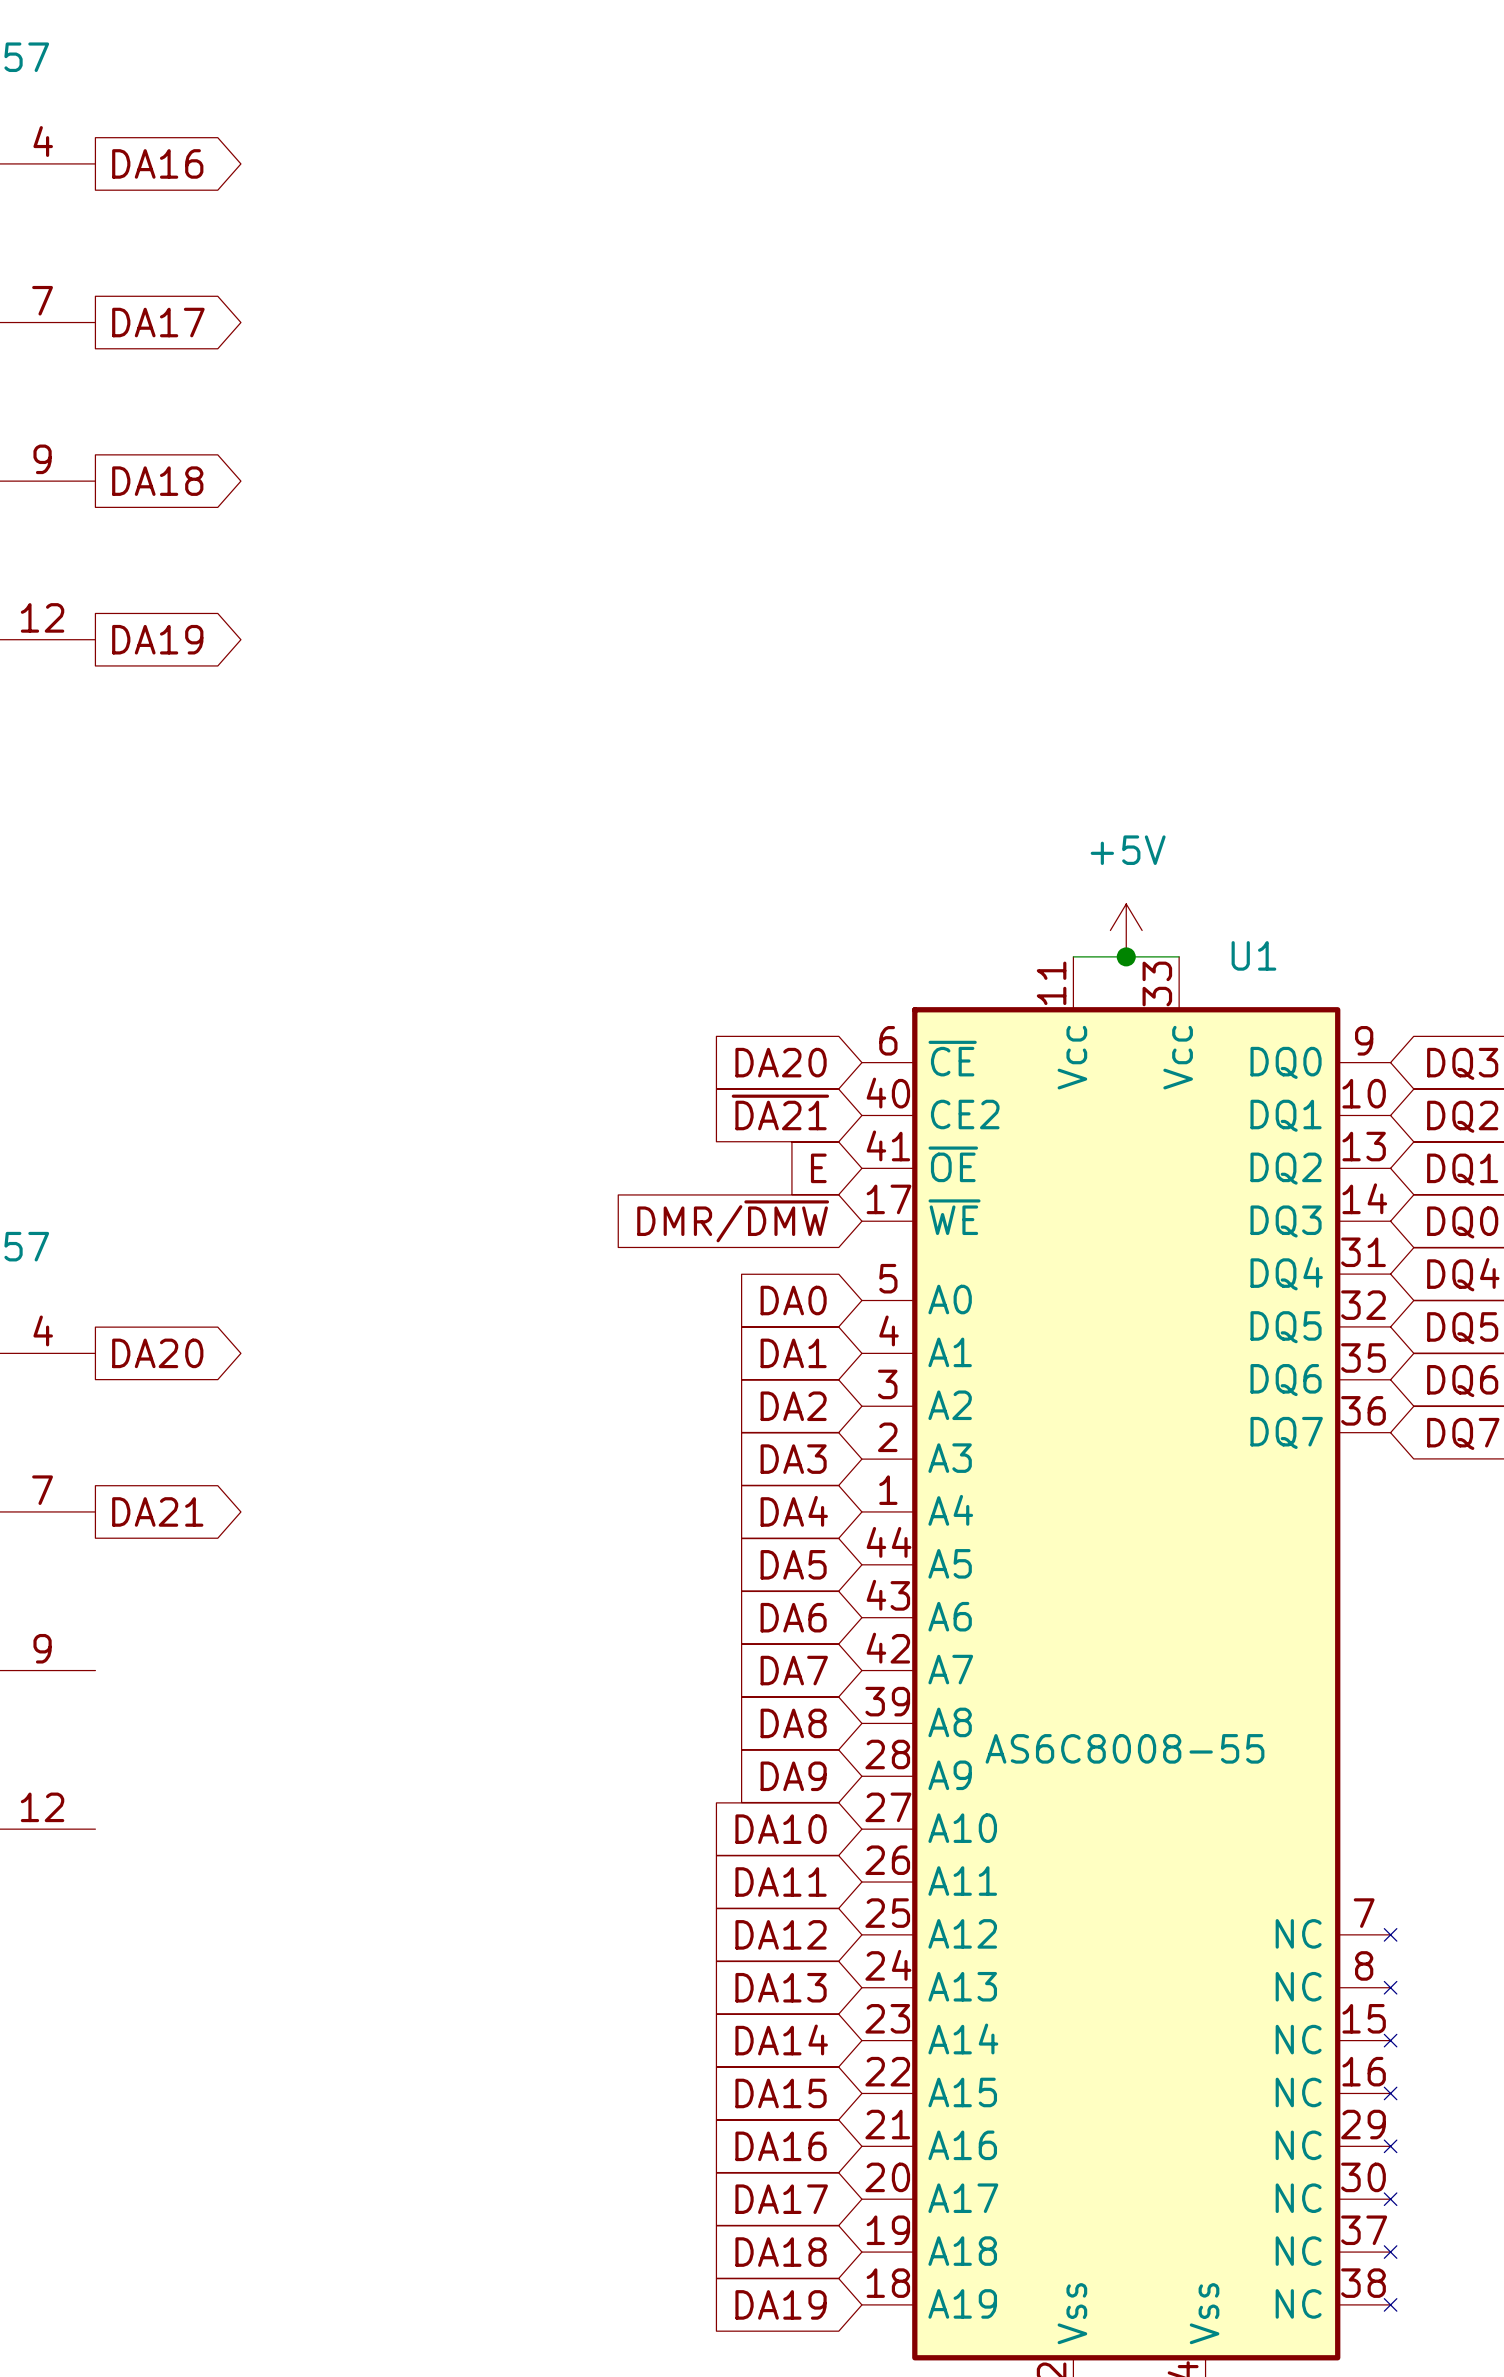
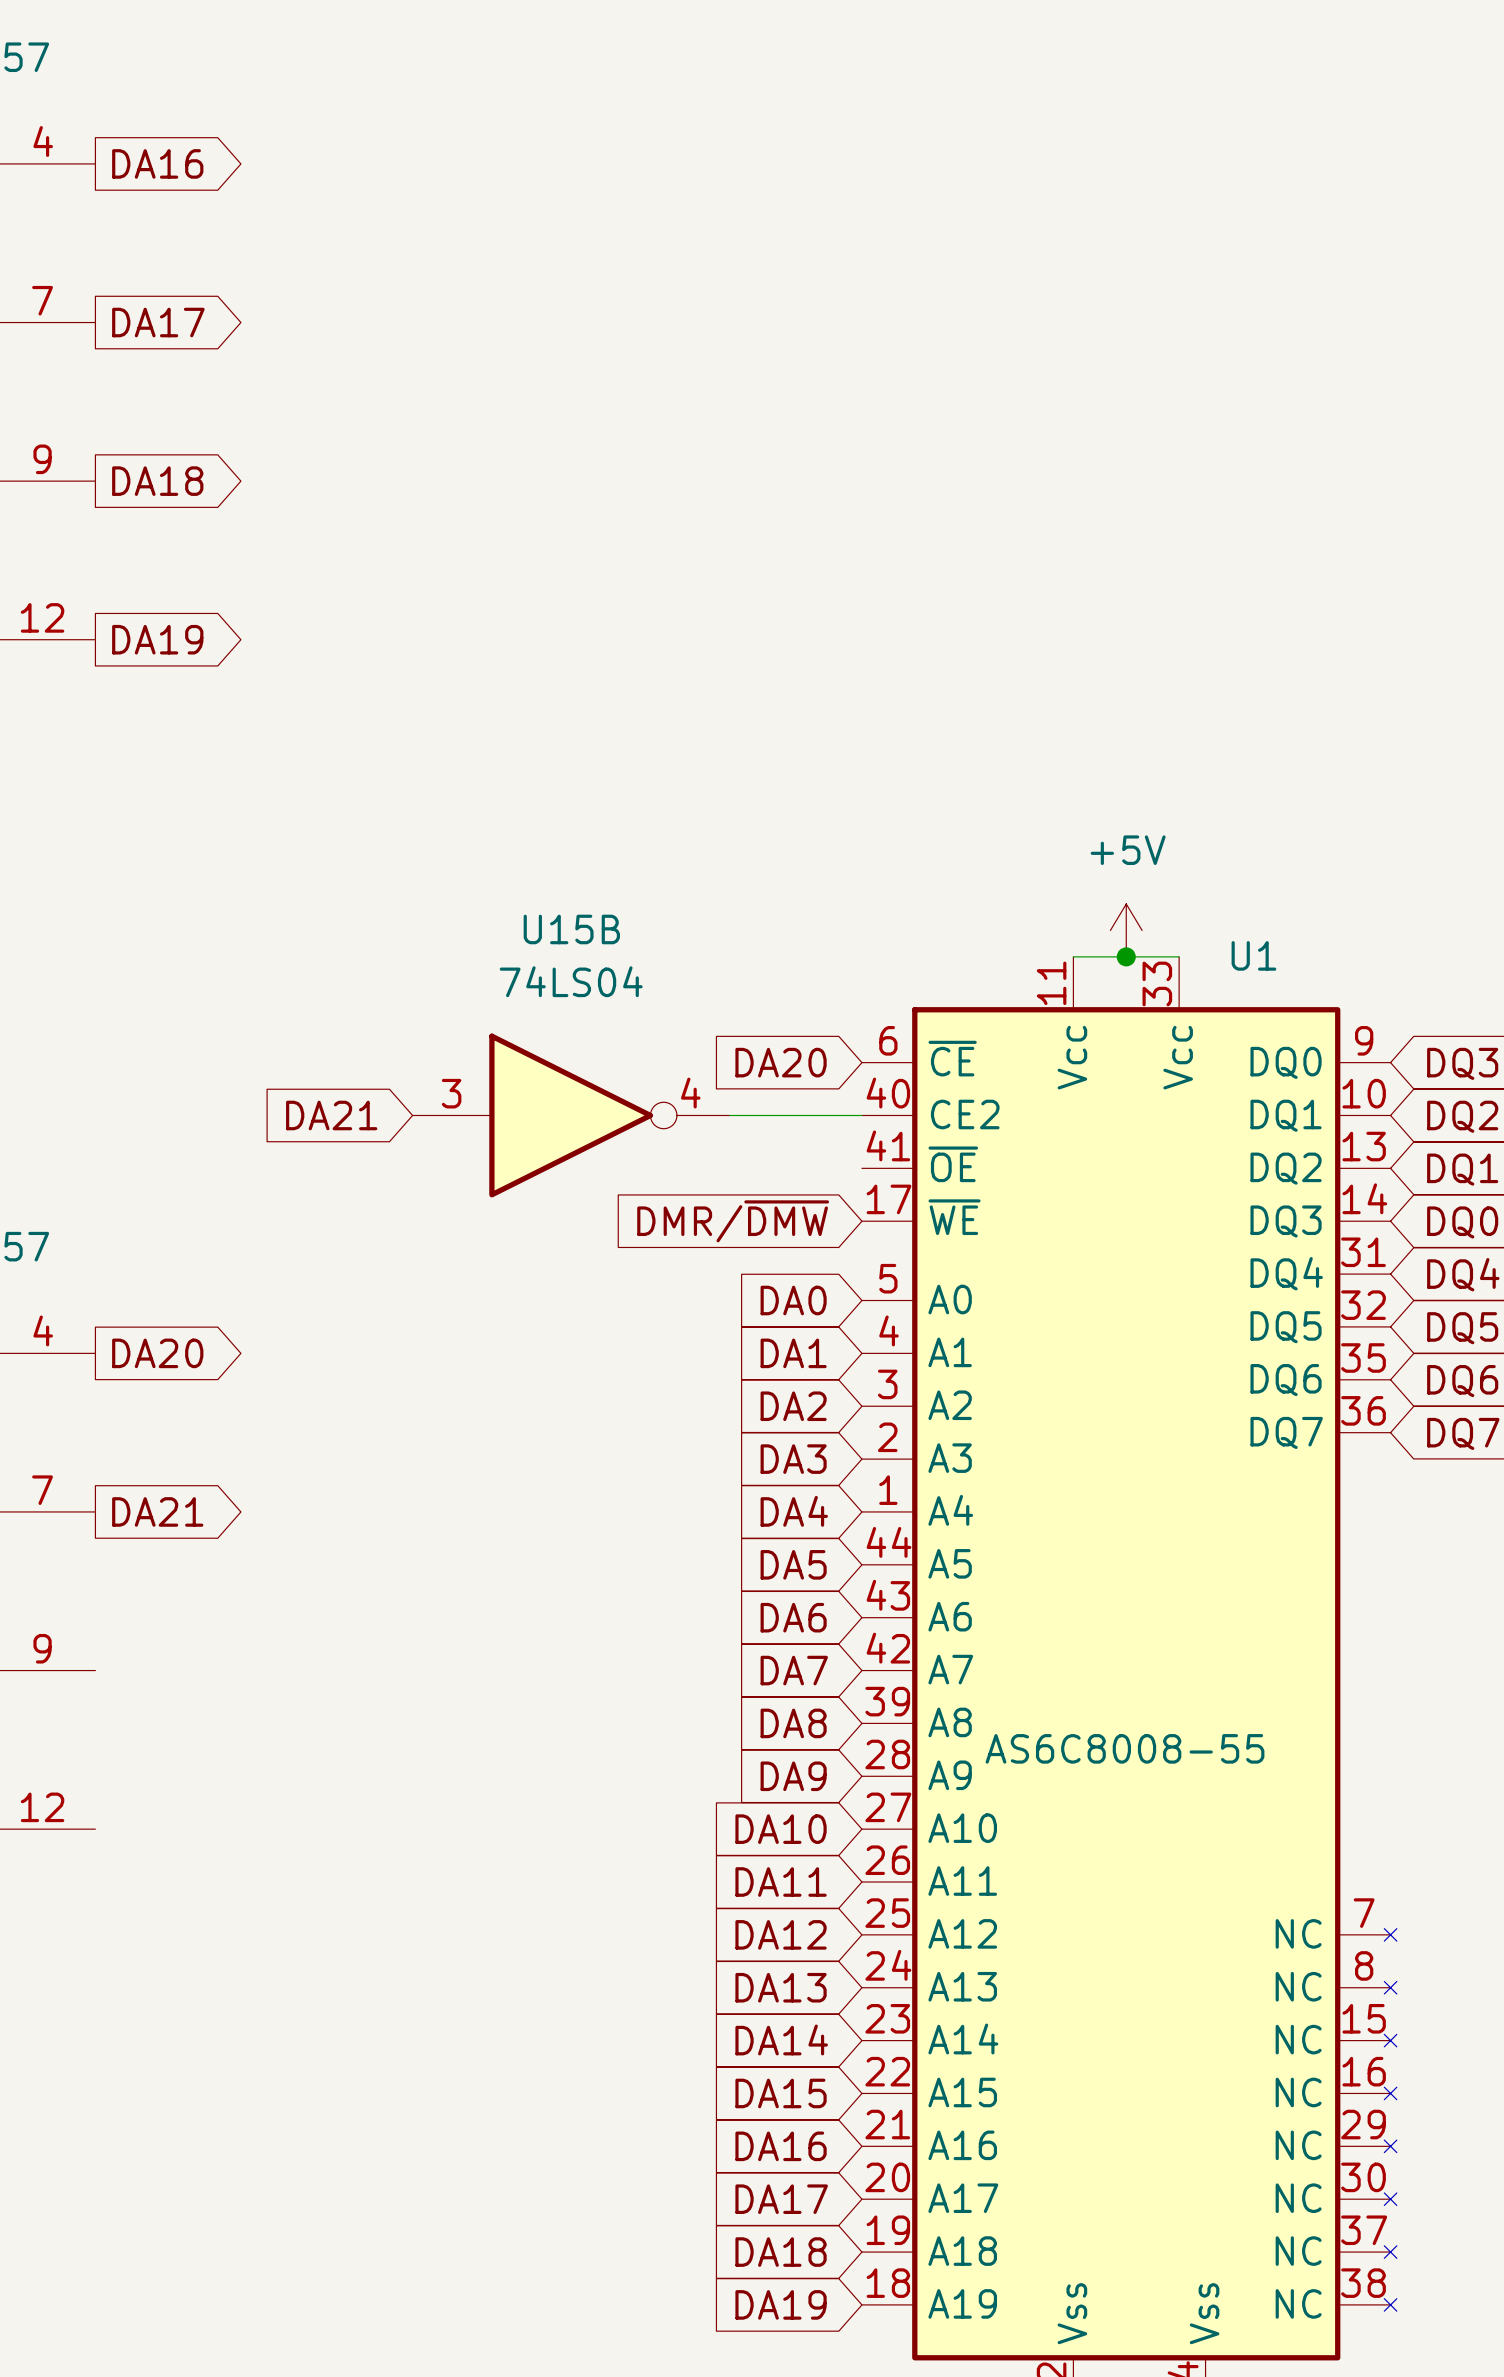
global label: ~{DA21} (780, 1112) -> none
global label: none -> DA21 (331, 1115)
U15B: none -> 74LS04 (571, 1115)
wire: none -> (729, 1115) (861, 1115)
global label: E (818, 1168) -> none

